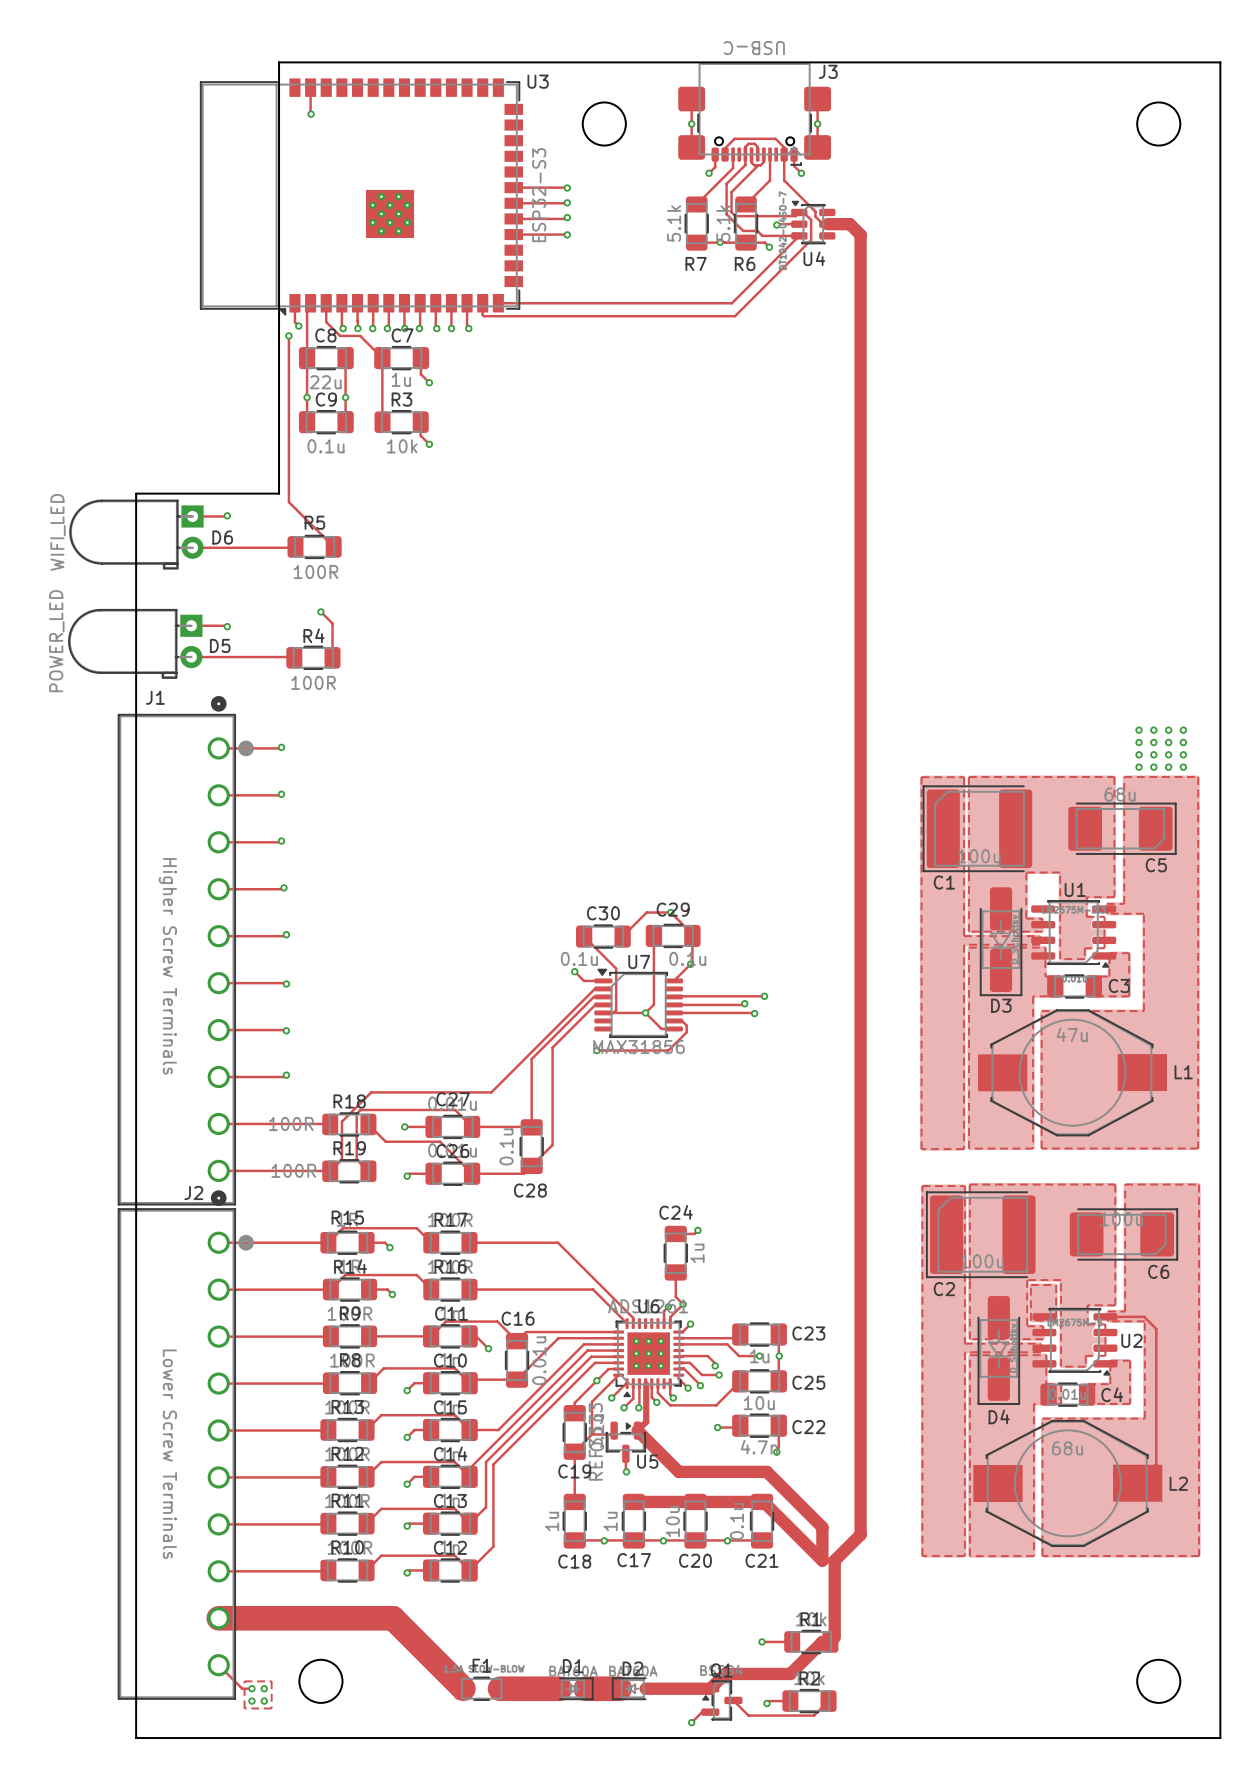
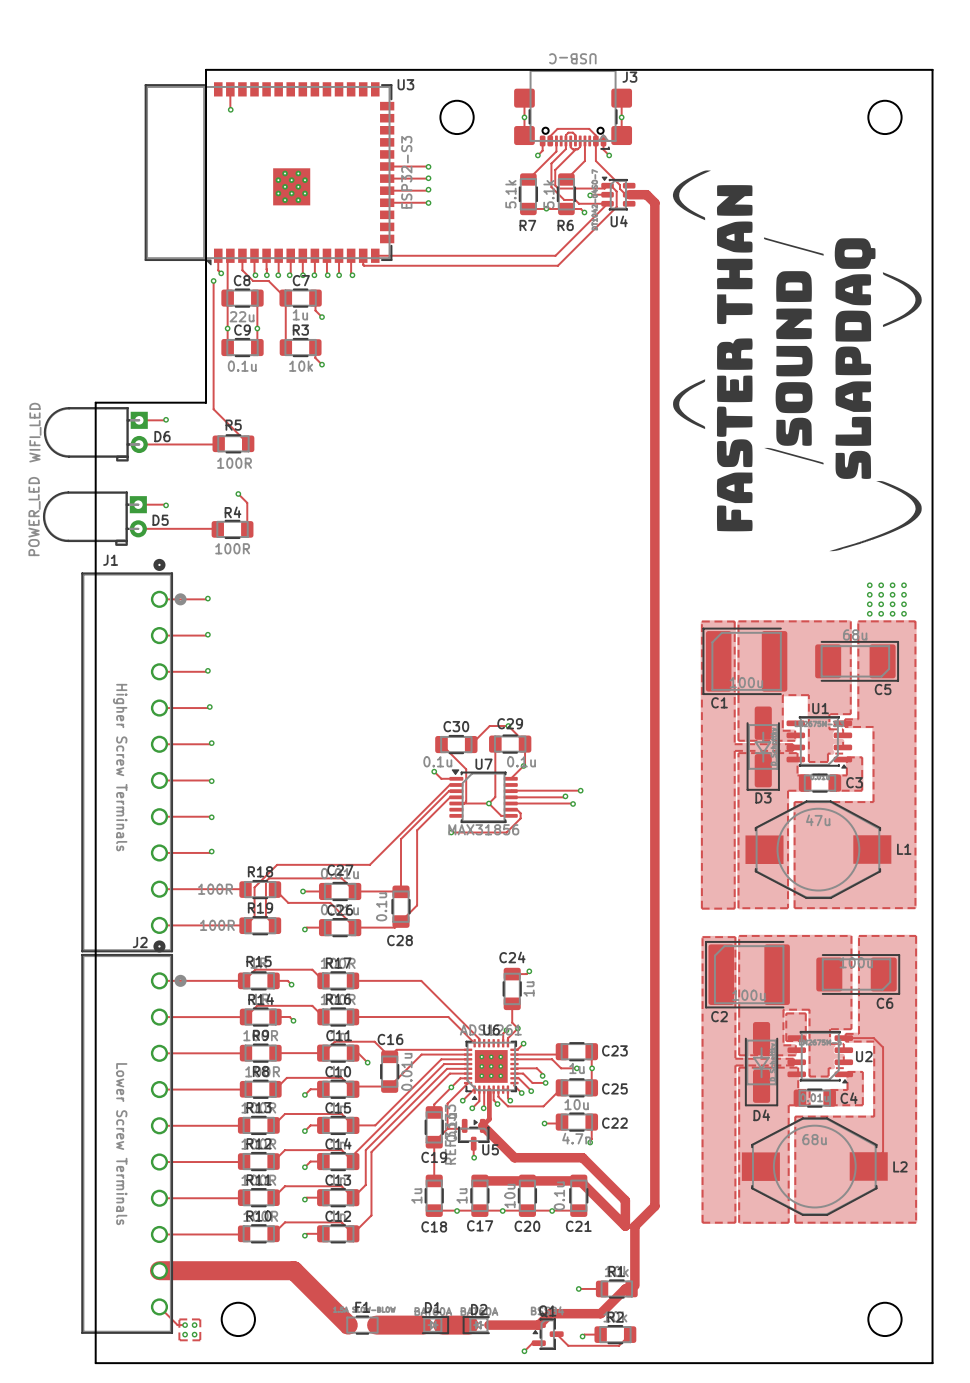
drawing: none -> [672, 170, 922, 552]

